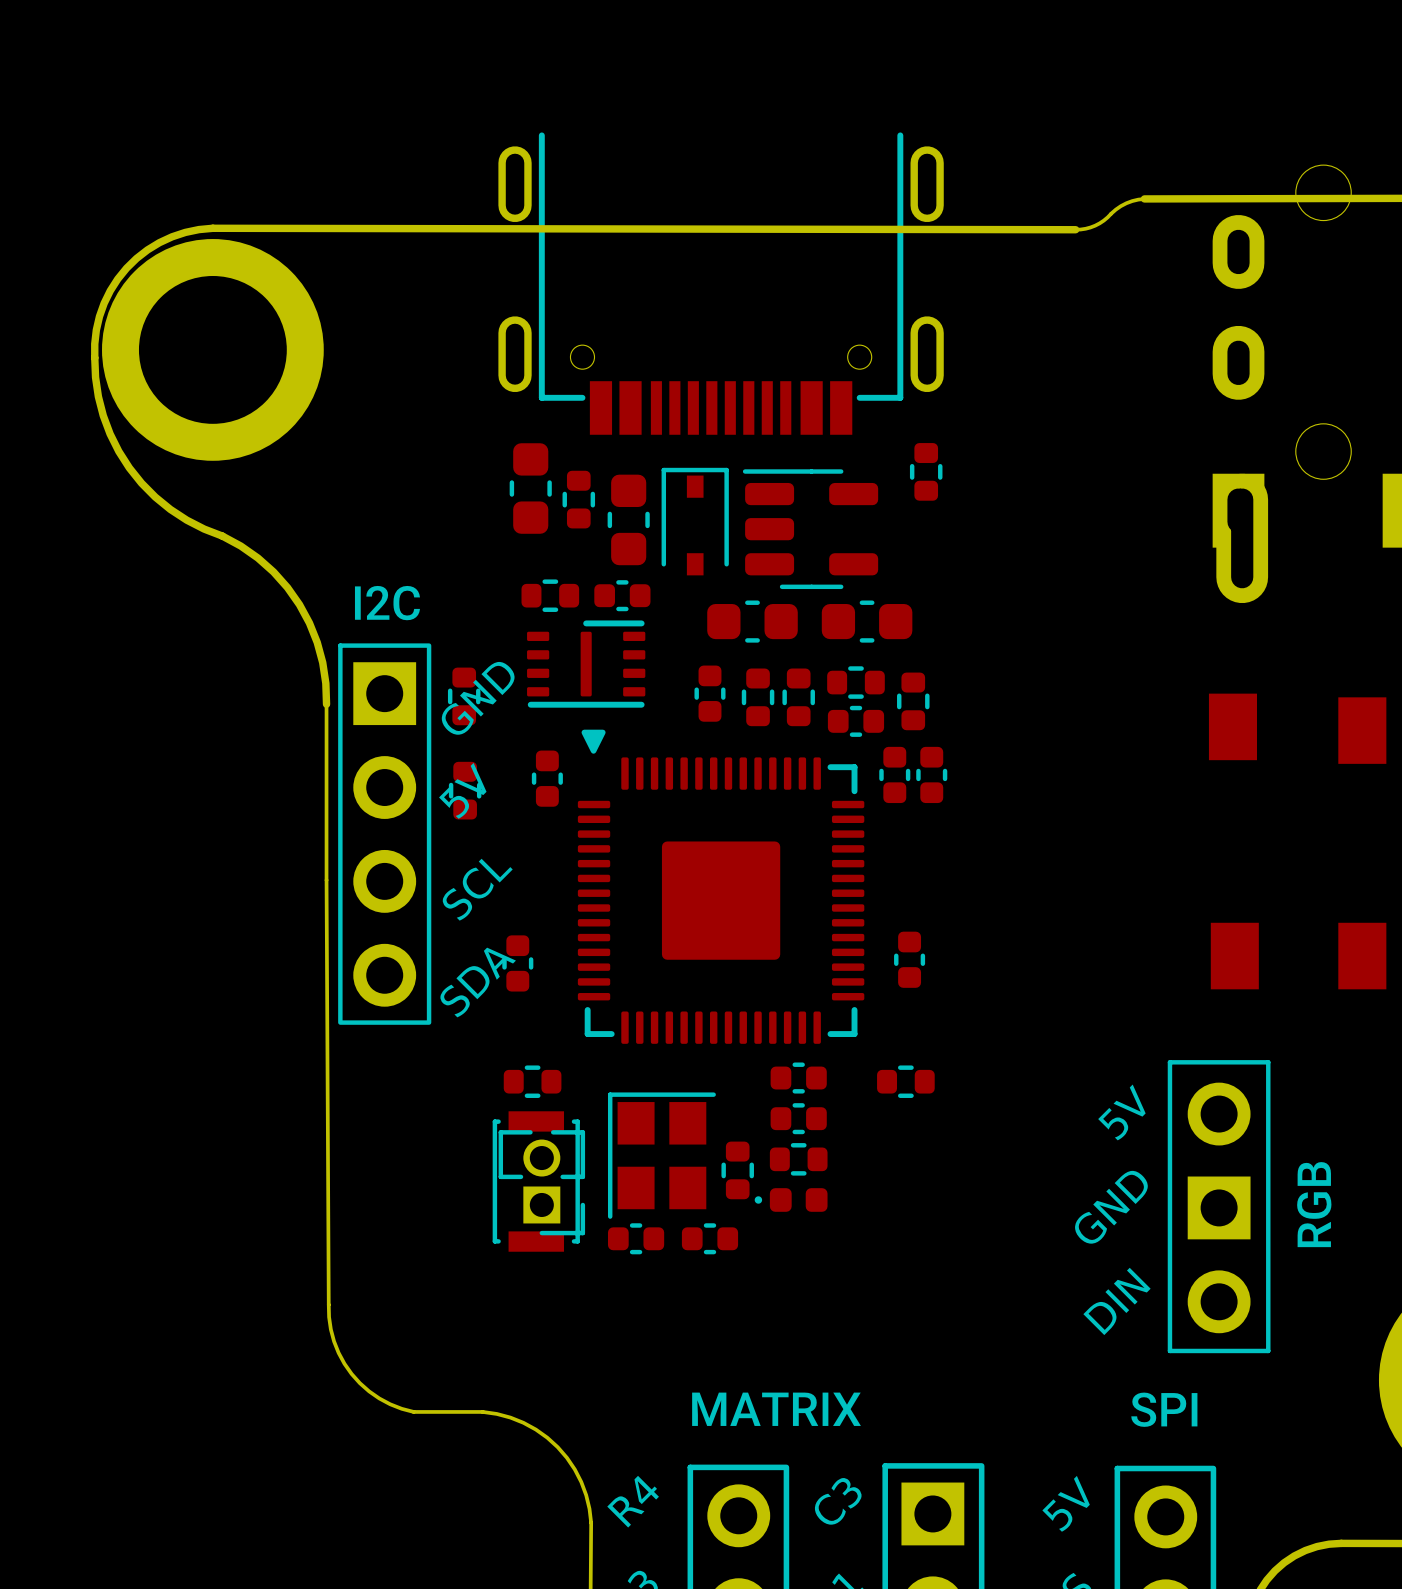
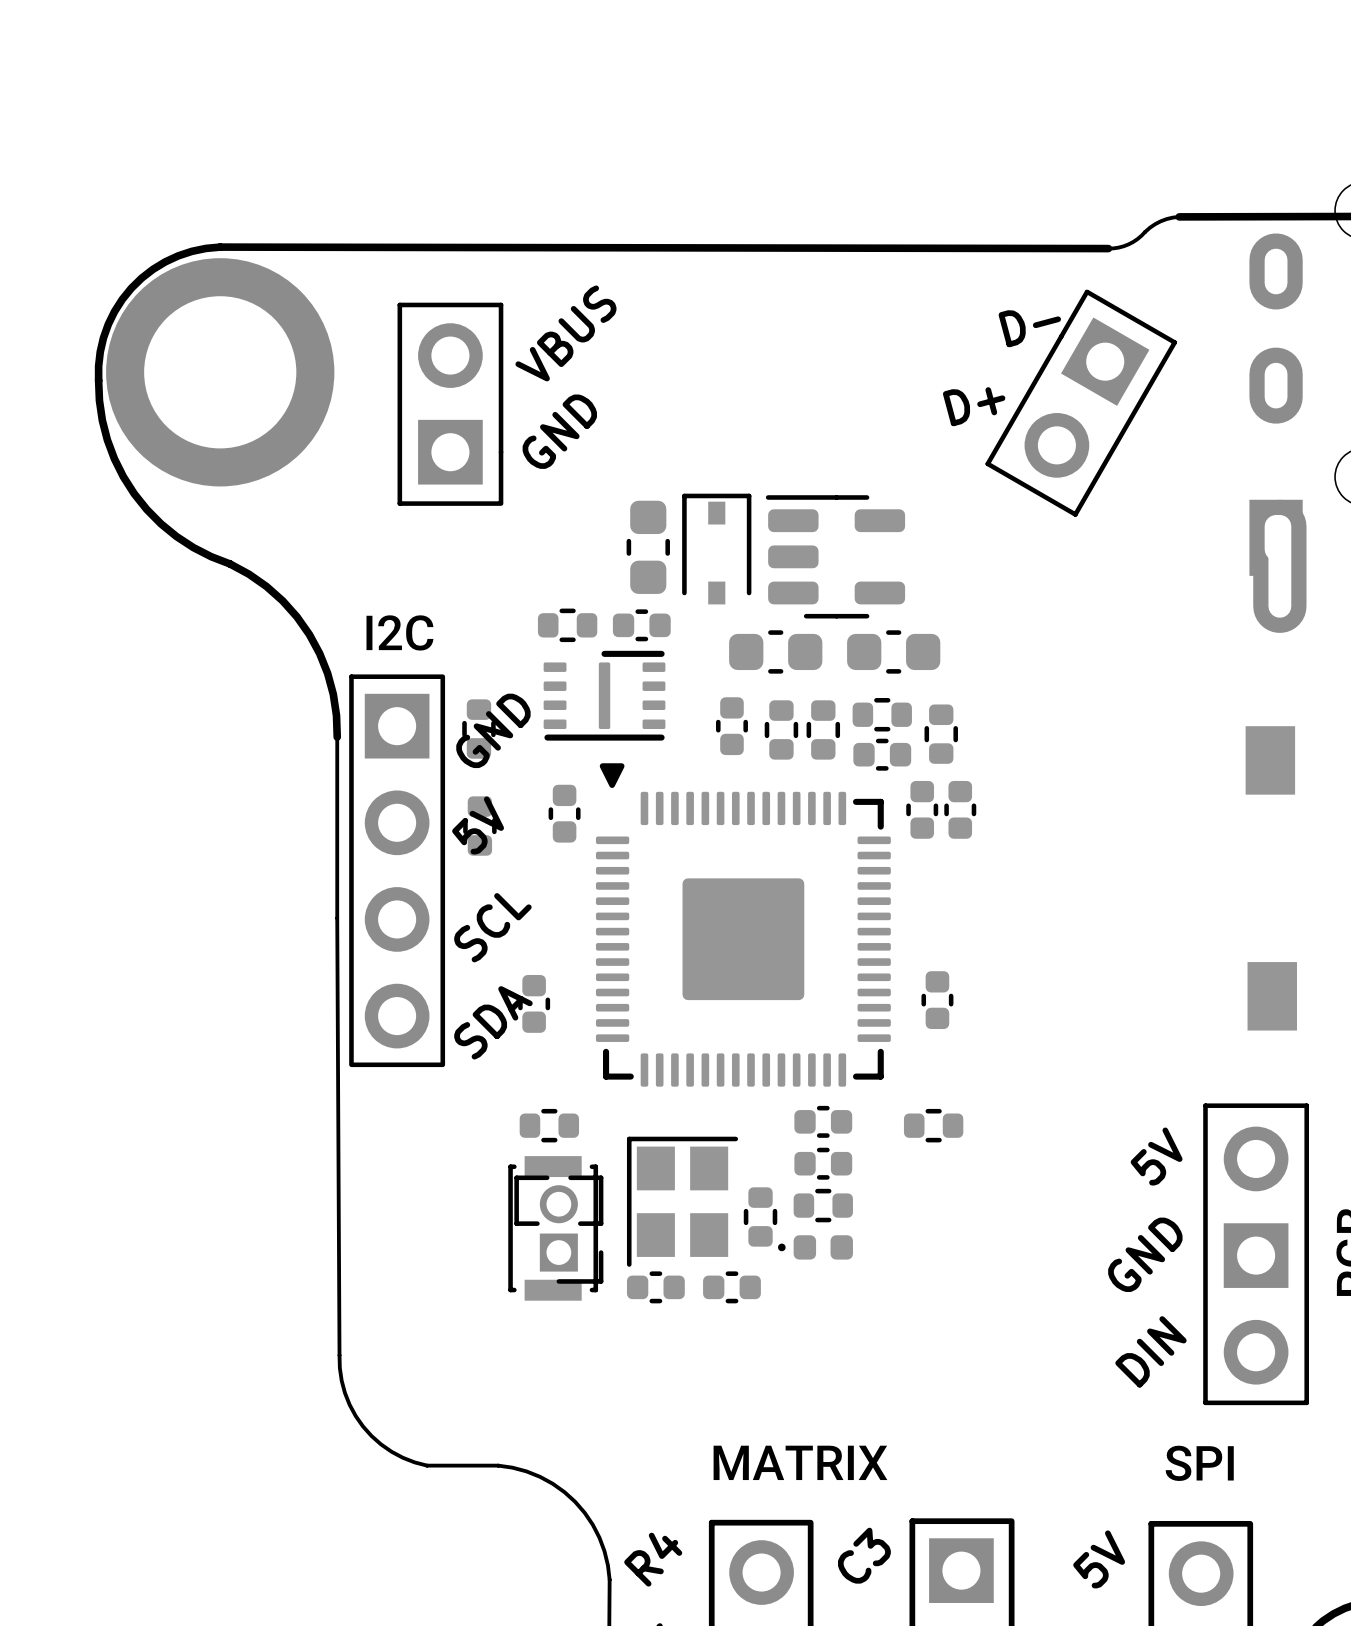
part: (721, 283) -> none
text: none -> D- (1029, 328)
text: none -> VBUS (565, 333)
part: none -> (1081, 403)
part: none -> (450, 404)
text: none -> D+ (974, 406)
text: none -> GND (559, 431)
part: (926, 471) -> none
part: (530, 488) -> none
part: (578, 499) -> none

